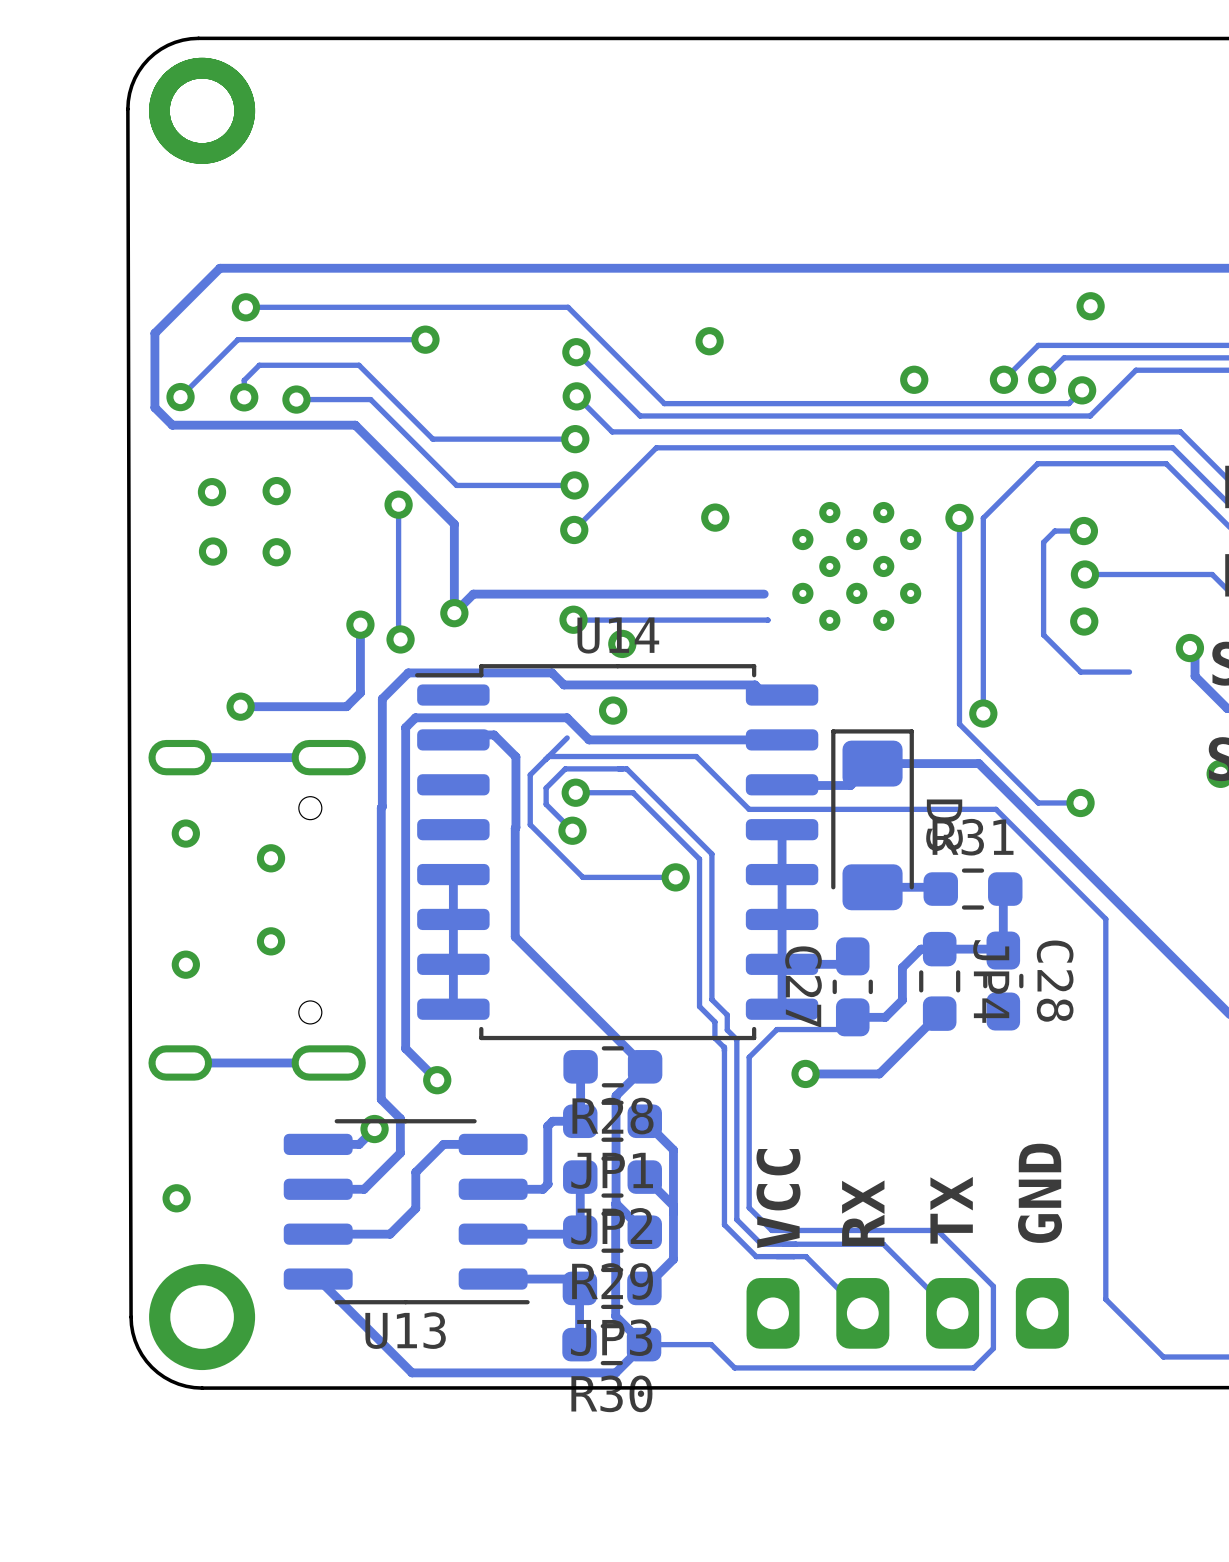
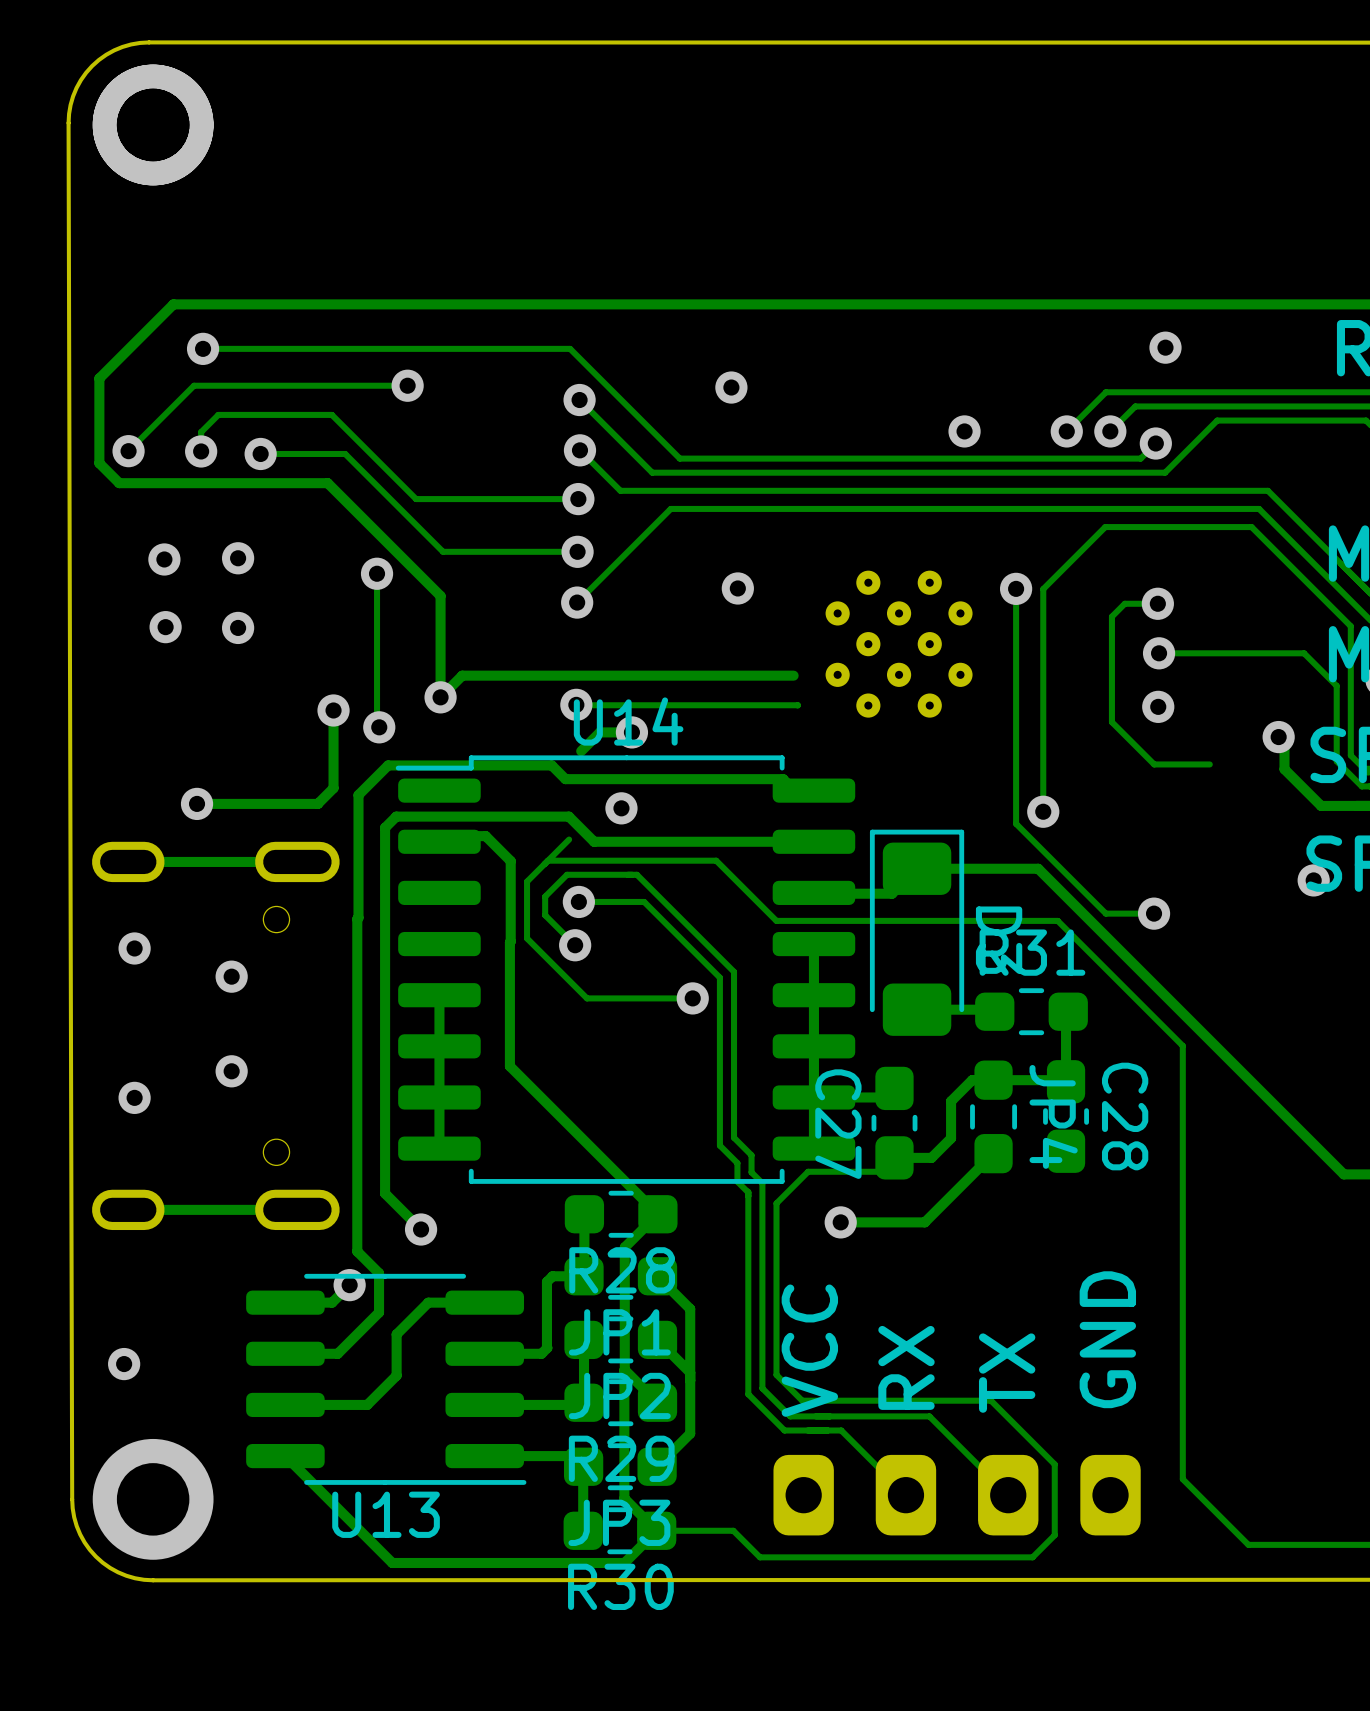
track: none -> (631, 732) (599, 732) (581, 751)

